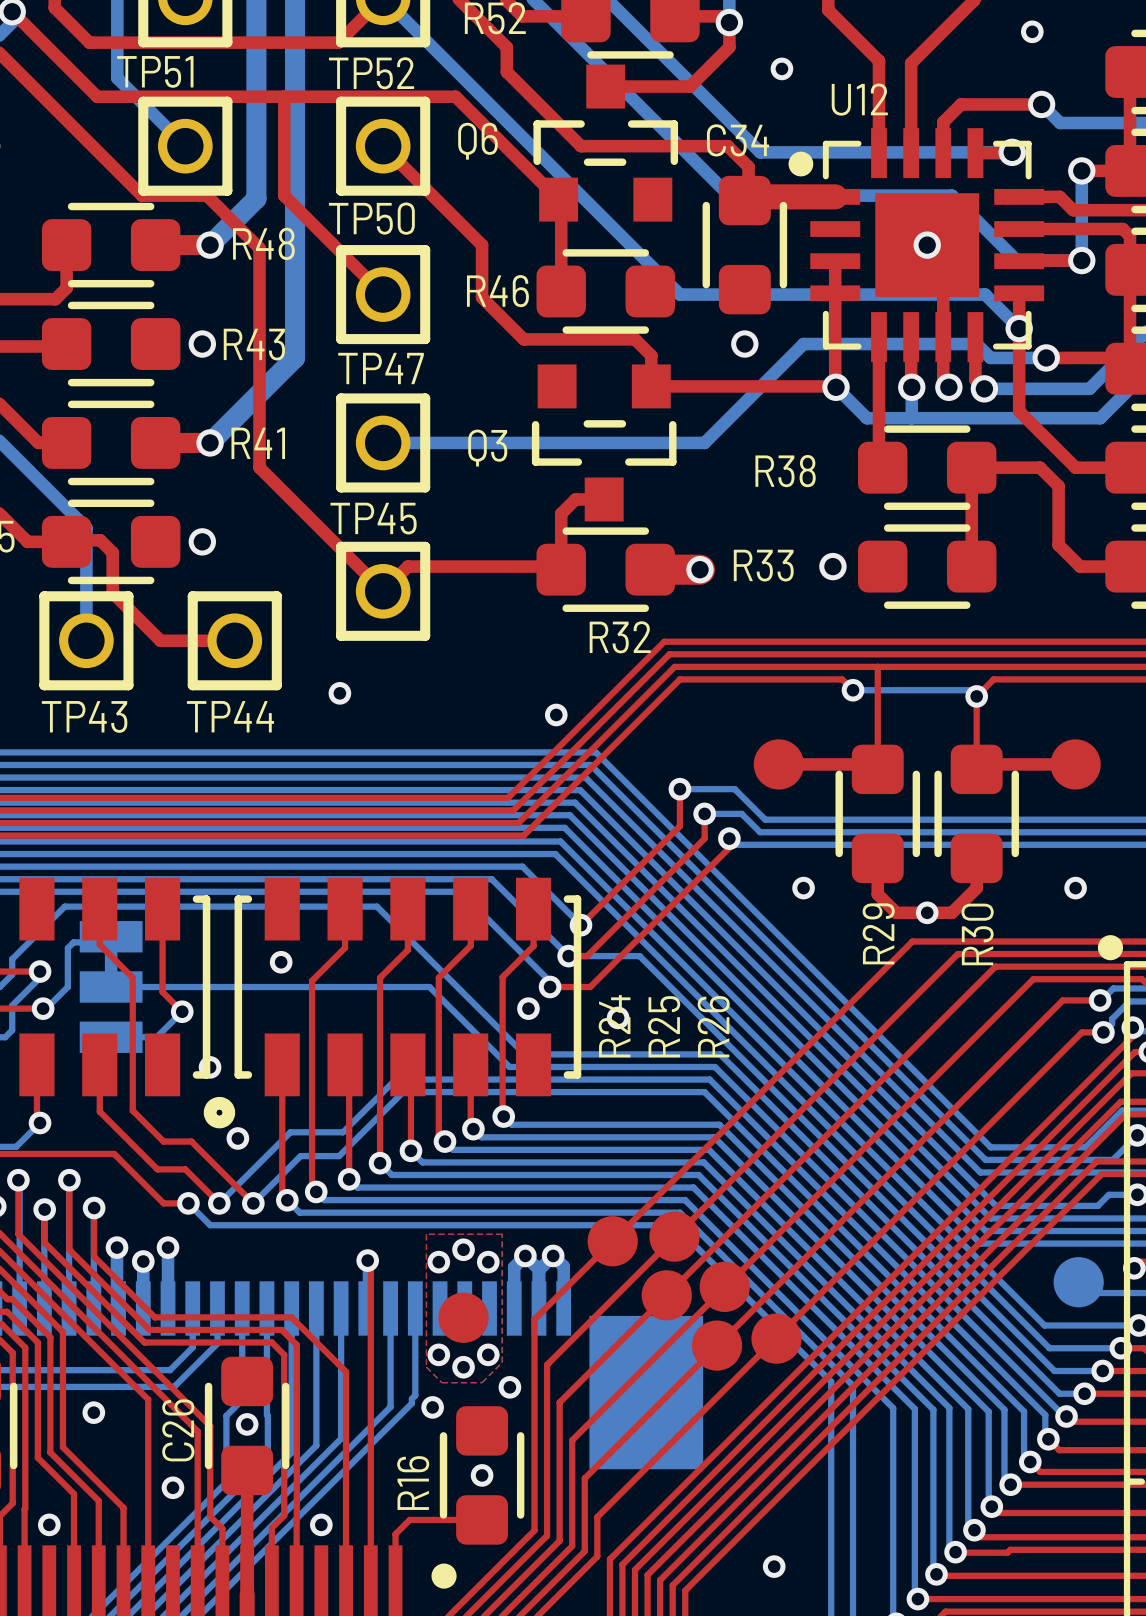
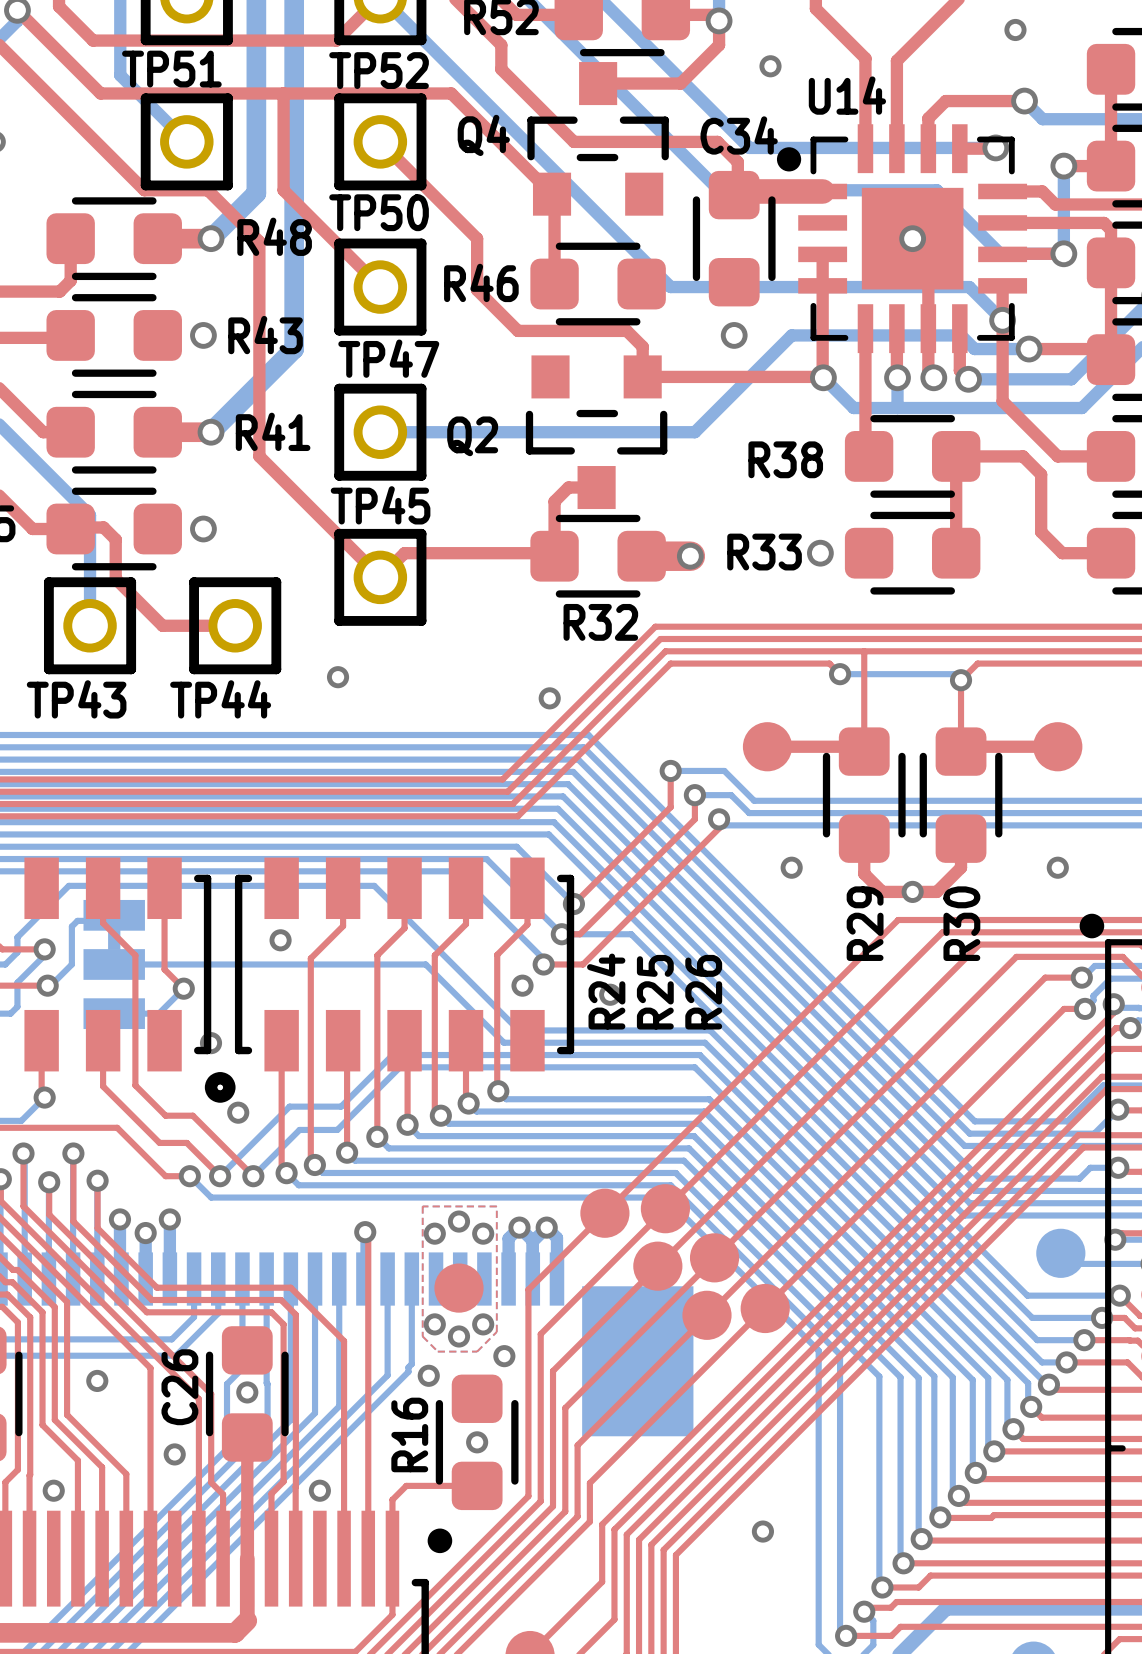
U12 name: U12 (859, 99) -> U14 (847, 95)
Q6 name: Q6 (478, 141) -> Q4 (483, 135)
Q3 name: Q3 (487, 448) -> Q2 (472, 436)

